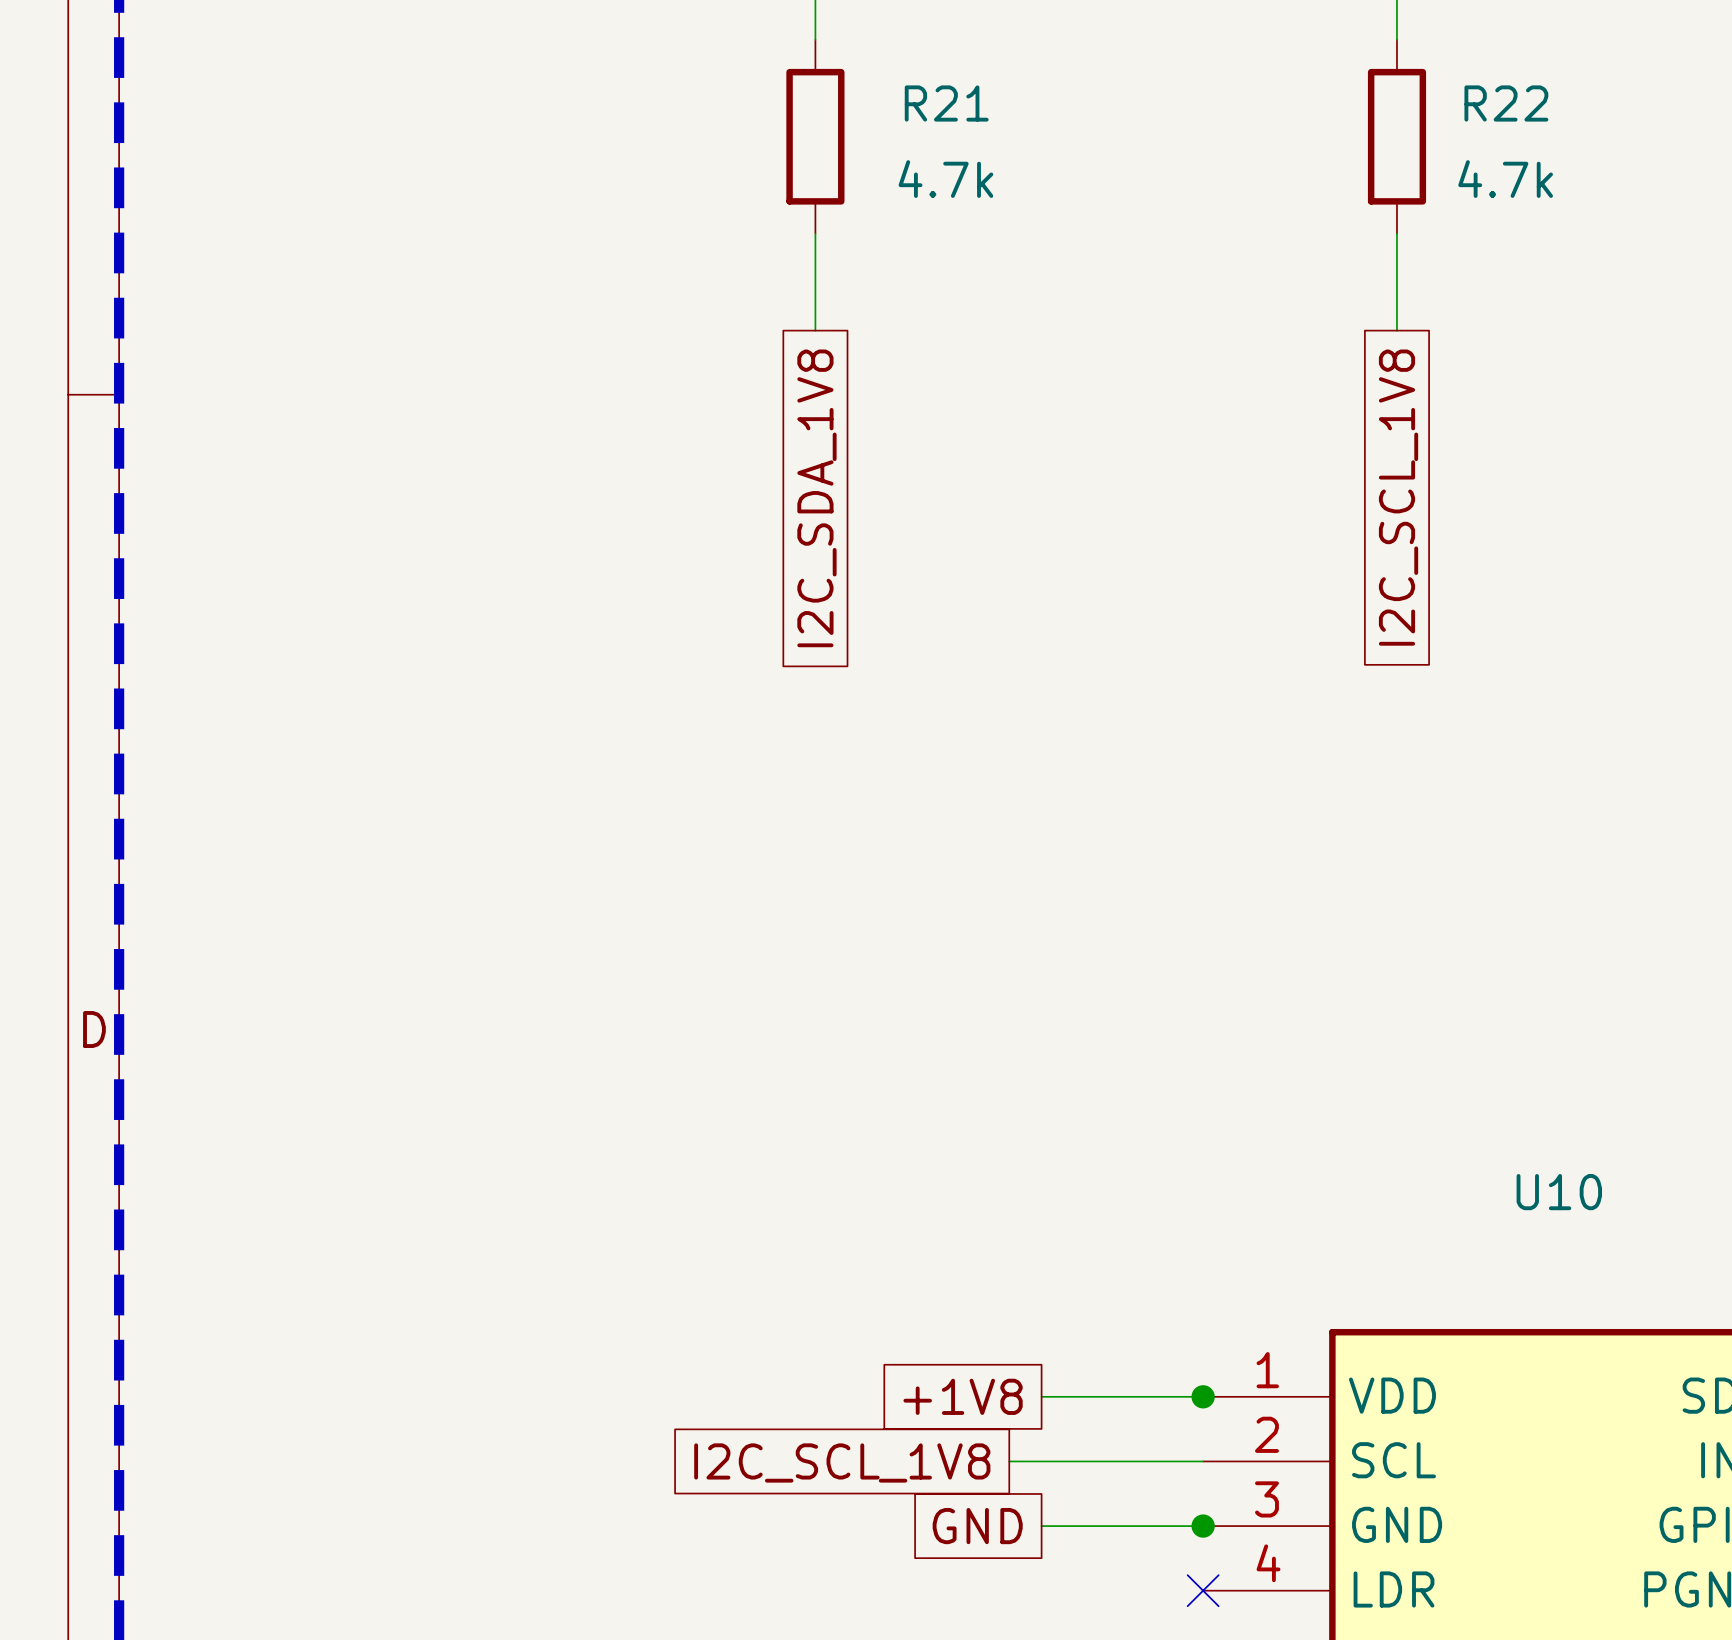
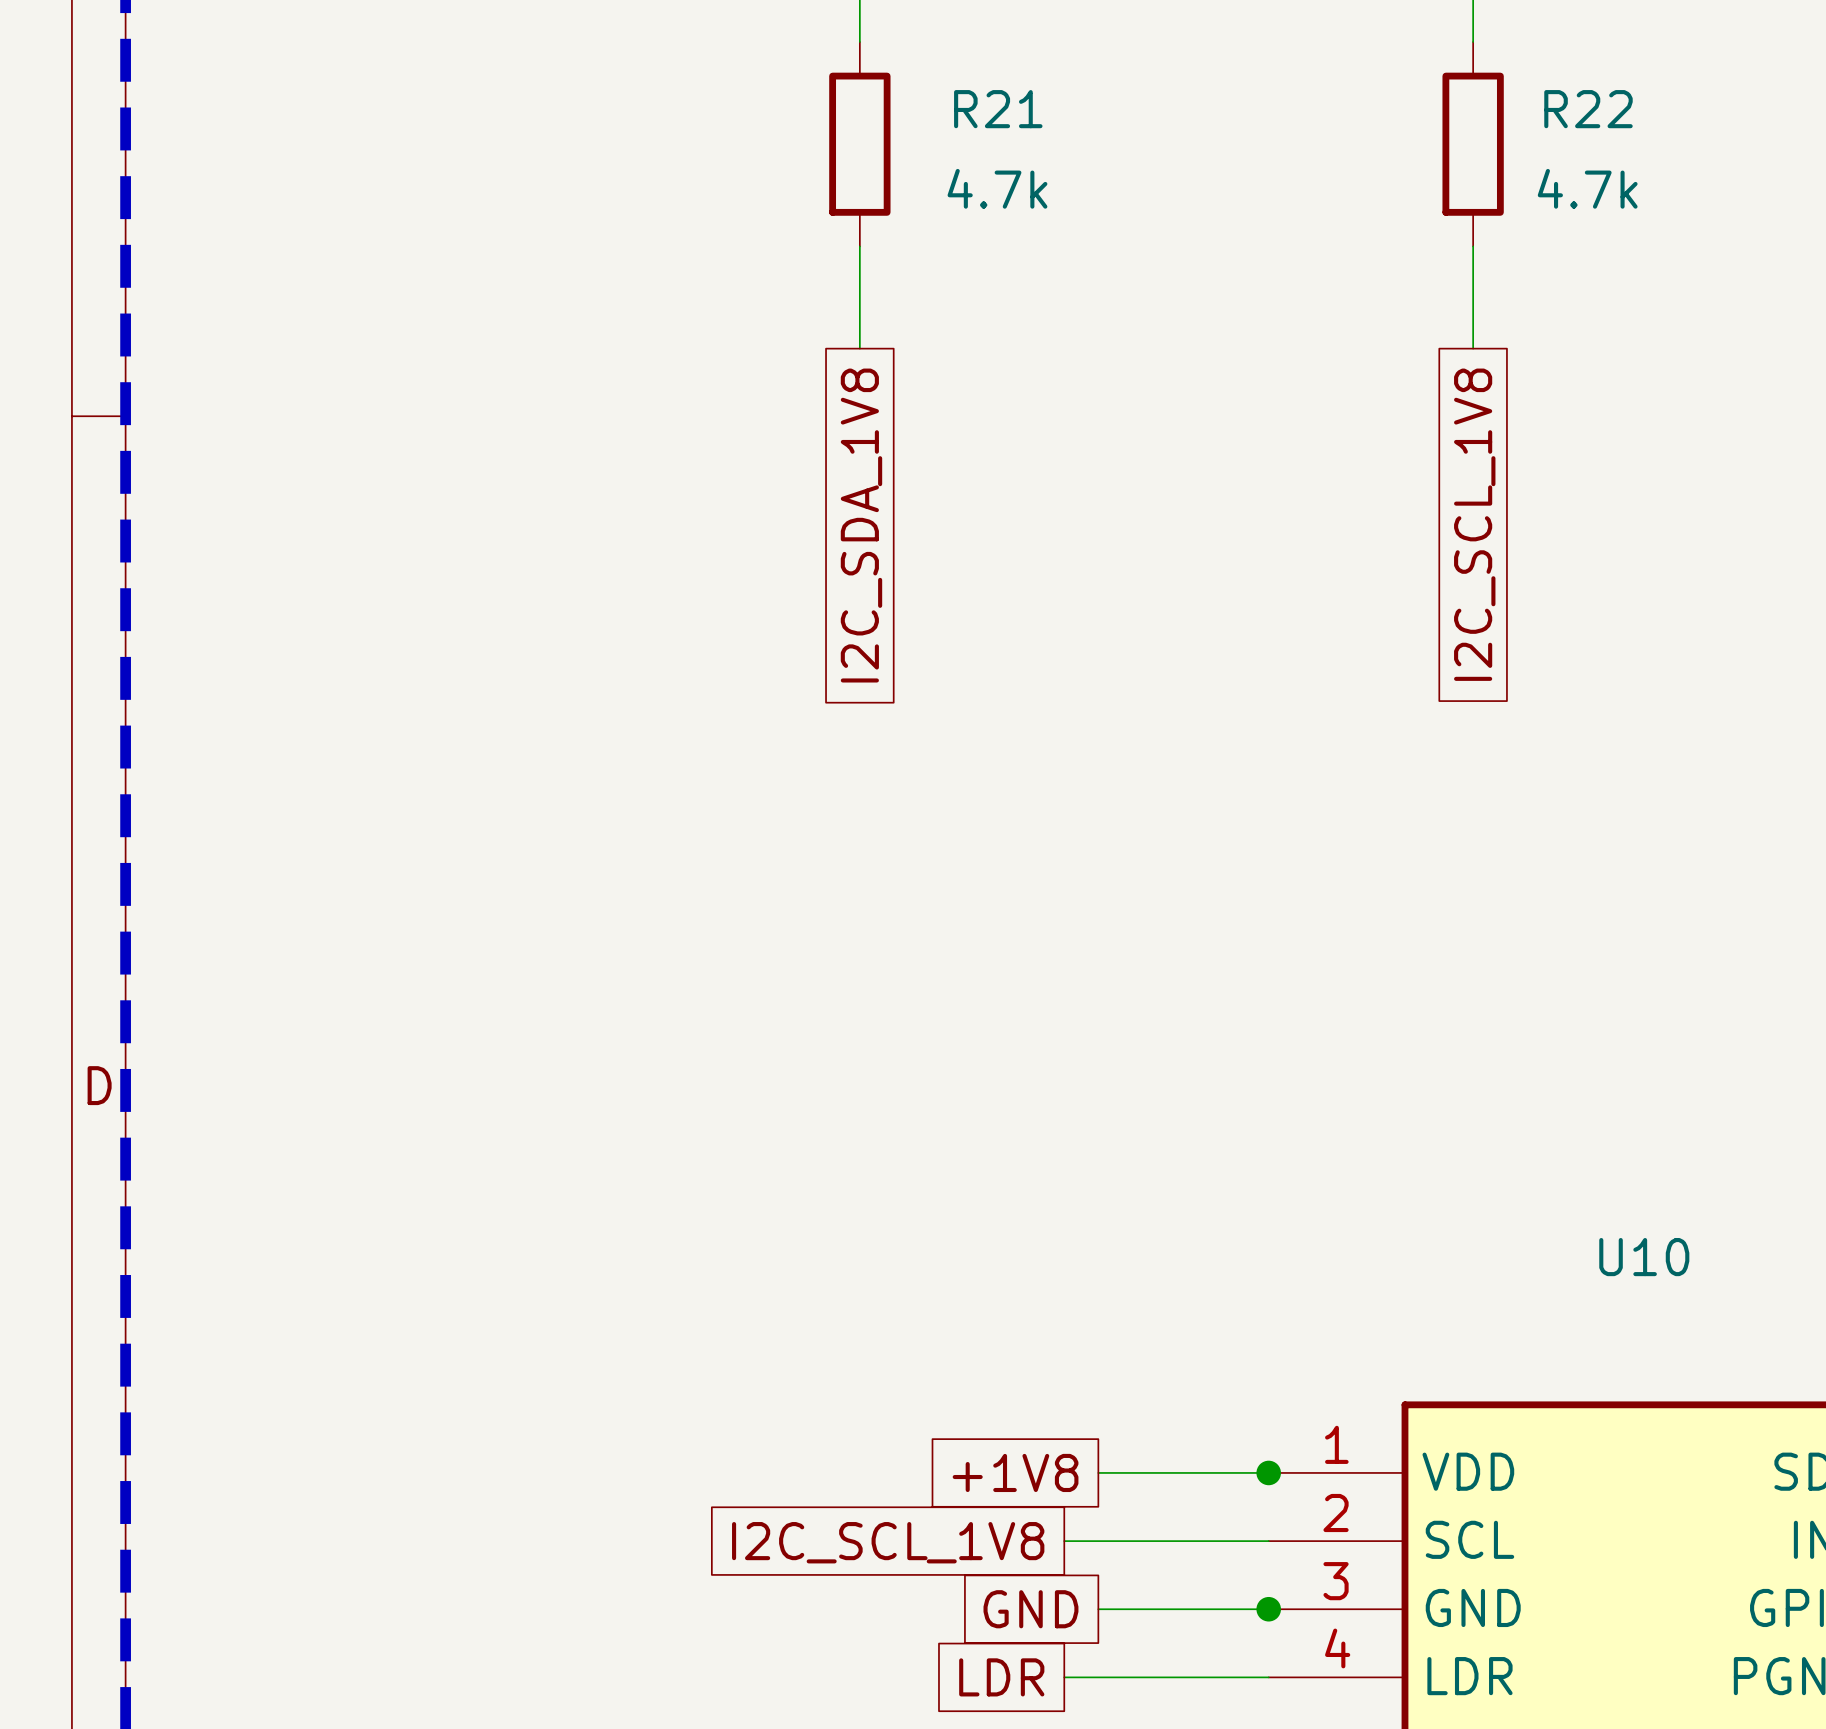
global label: none -> LDR (1001, 1677)
wire: none -> (1064, 1677) (1268, 1677)
no-connect mark: (1203, 1590) -> none

